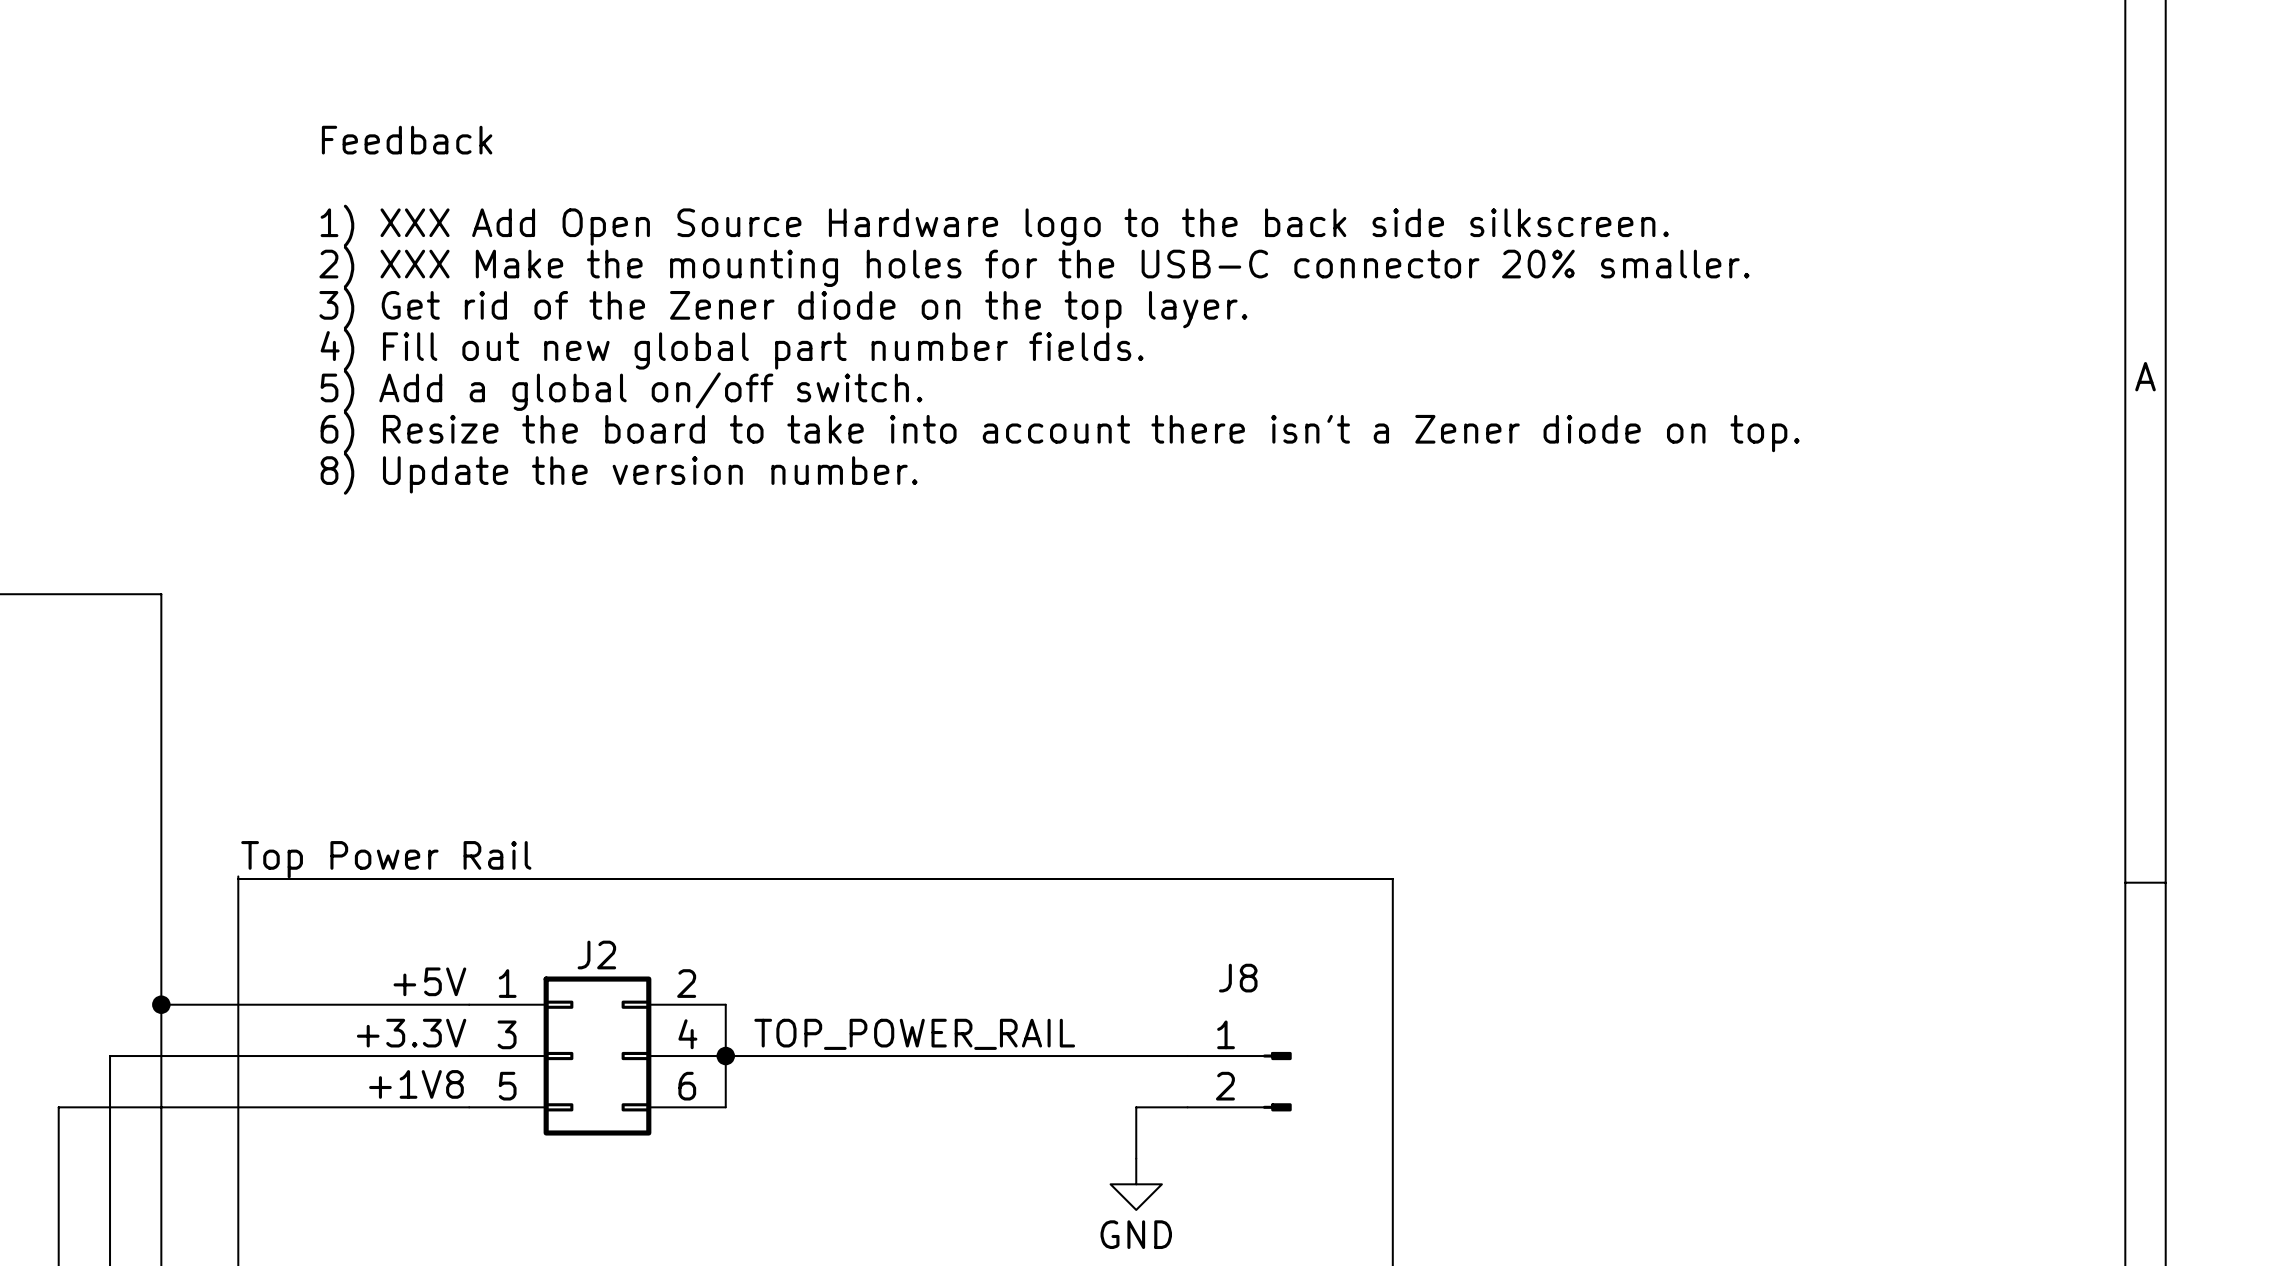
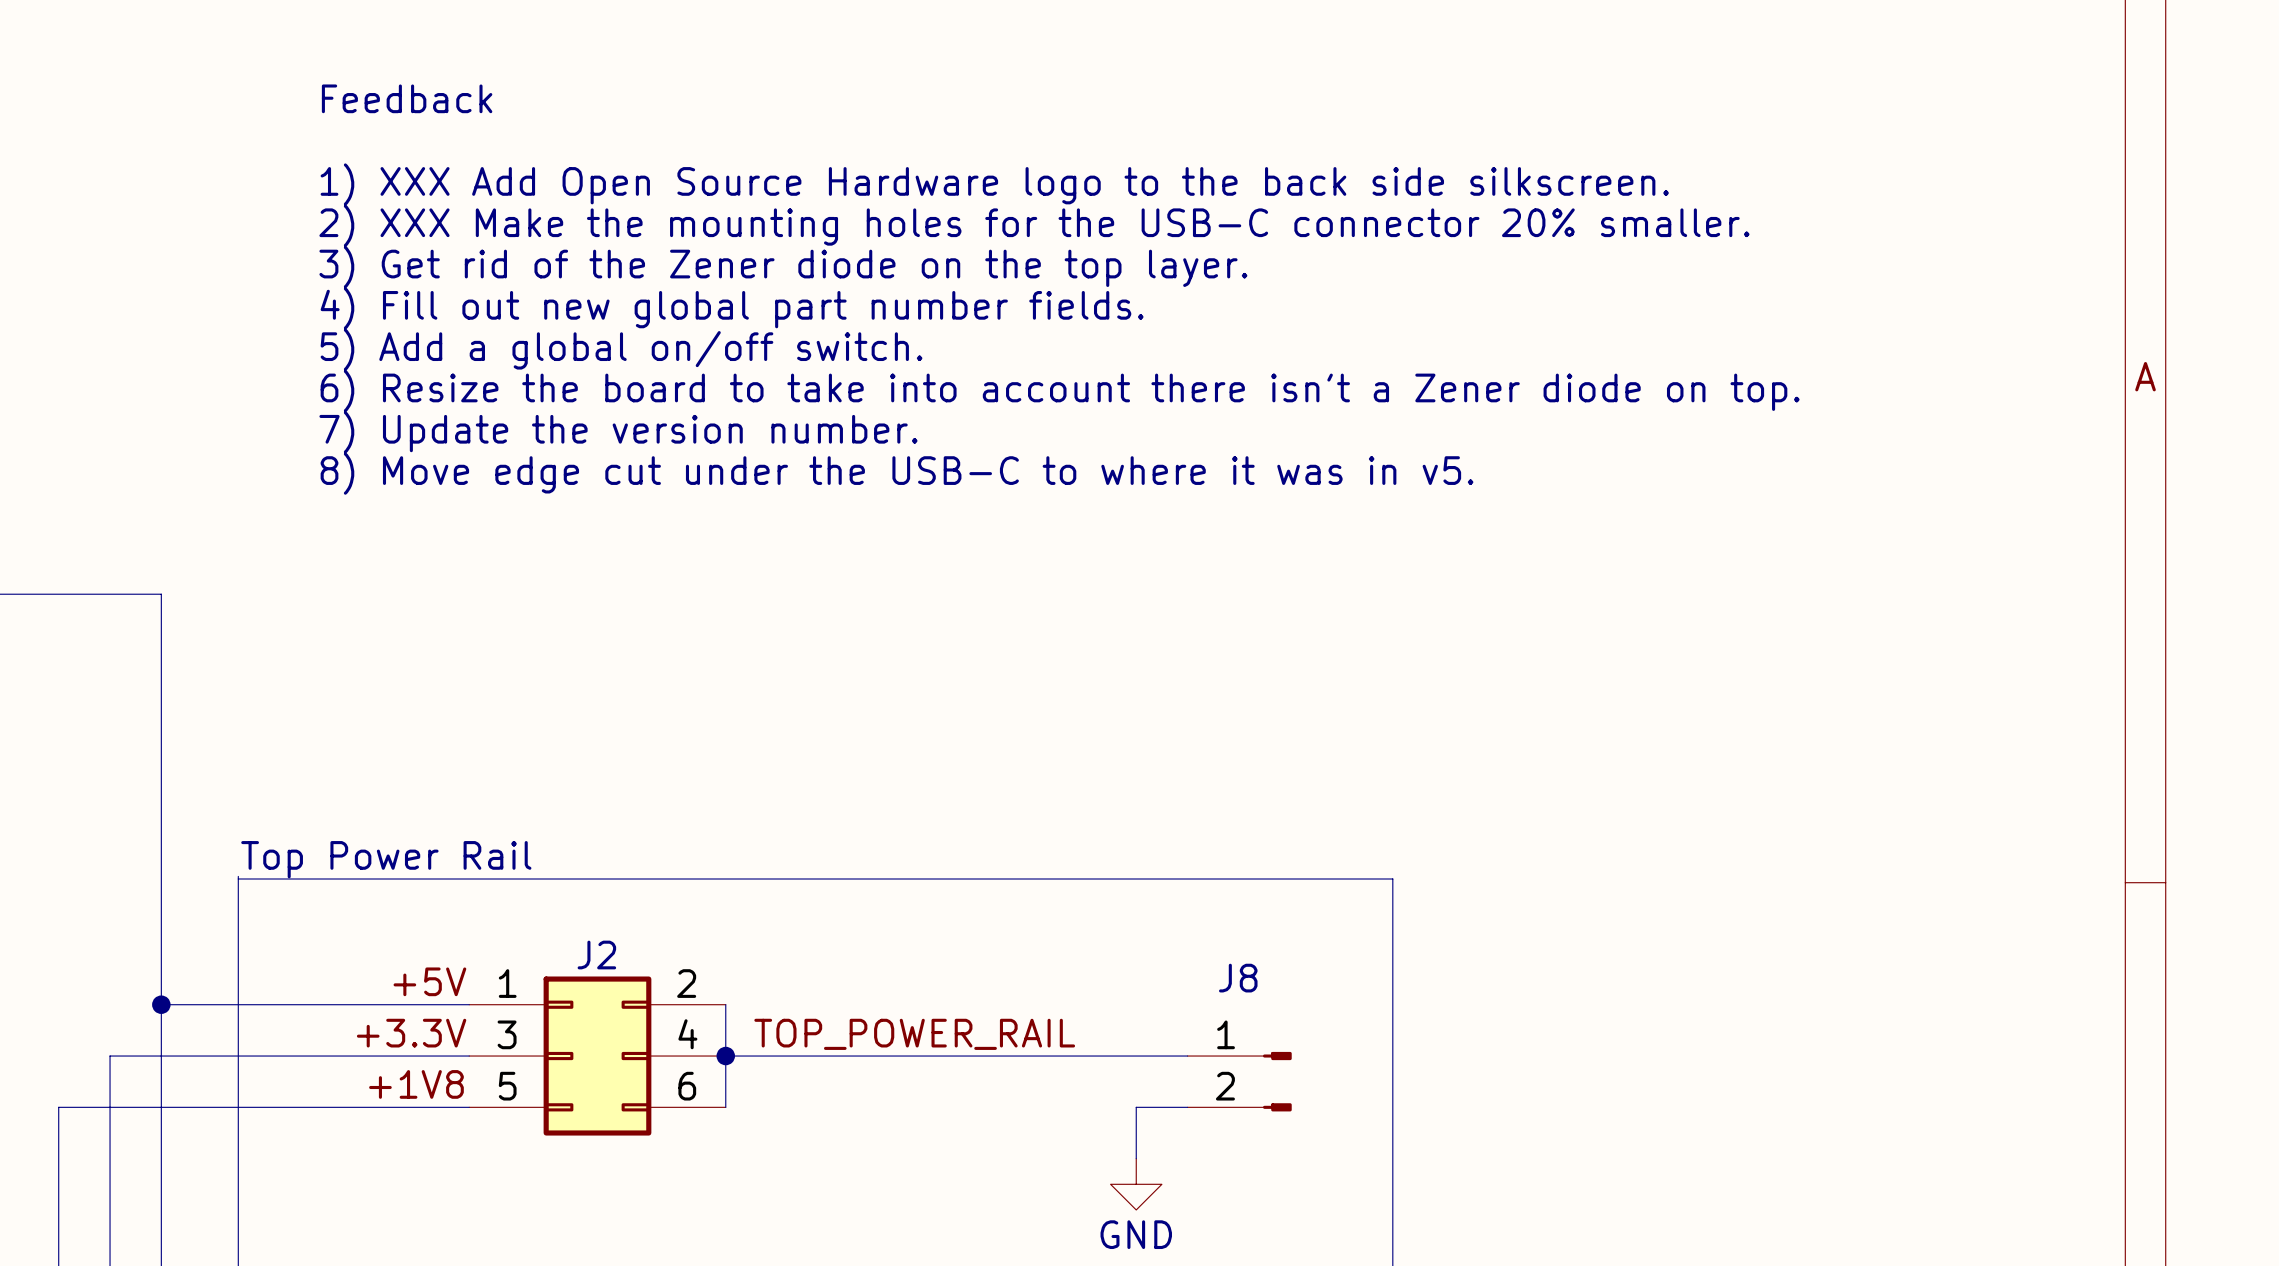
text position: Feedback (407, 140) -> Feedback (407, 98)
text: none -> 1) XXX Add Open Source Hardware logo to the back side silkscreen. (994, 184)
text: 1) XXX Add Open Source Hardware logo to the back side silkscreen. (994, 225) -> 2) XXX Make the mounting holes for the USB-C connector 20% smaller. (1034, 225)
text: 2) XXX Make the mounting holes for the USB-C connector 20% smaller. (1034, 267) -> 3) Get rid of the Zener diode on the top layer. (783, 267)
text: 3) Get rid of the Zener diode on the top layer. (783, 308) -> 4) Fill out new global part number fields. (732, 308)
text: 4) Fill out new global part number fields. (732, 349) -> 5) Add a global on/off switch. (621, 349)
text: 5) Add a global on/off switch. (621, 391) -> 6) Resize the board to take into account there isn't a Zener diode on top. (1060, 391)
text: 6) Resize the board to take into account there isn't a Zener diode on top. (1060, 432) -> 7) Update the version number. (618, 432)
text: 8) Update the version number. (619, 473) -> 8) Move edge cut under the USB-C to where it was in v5. (896, 473)

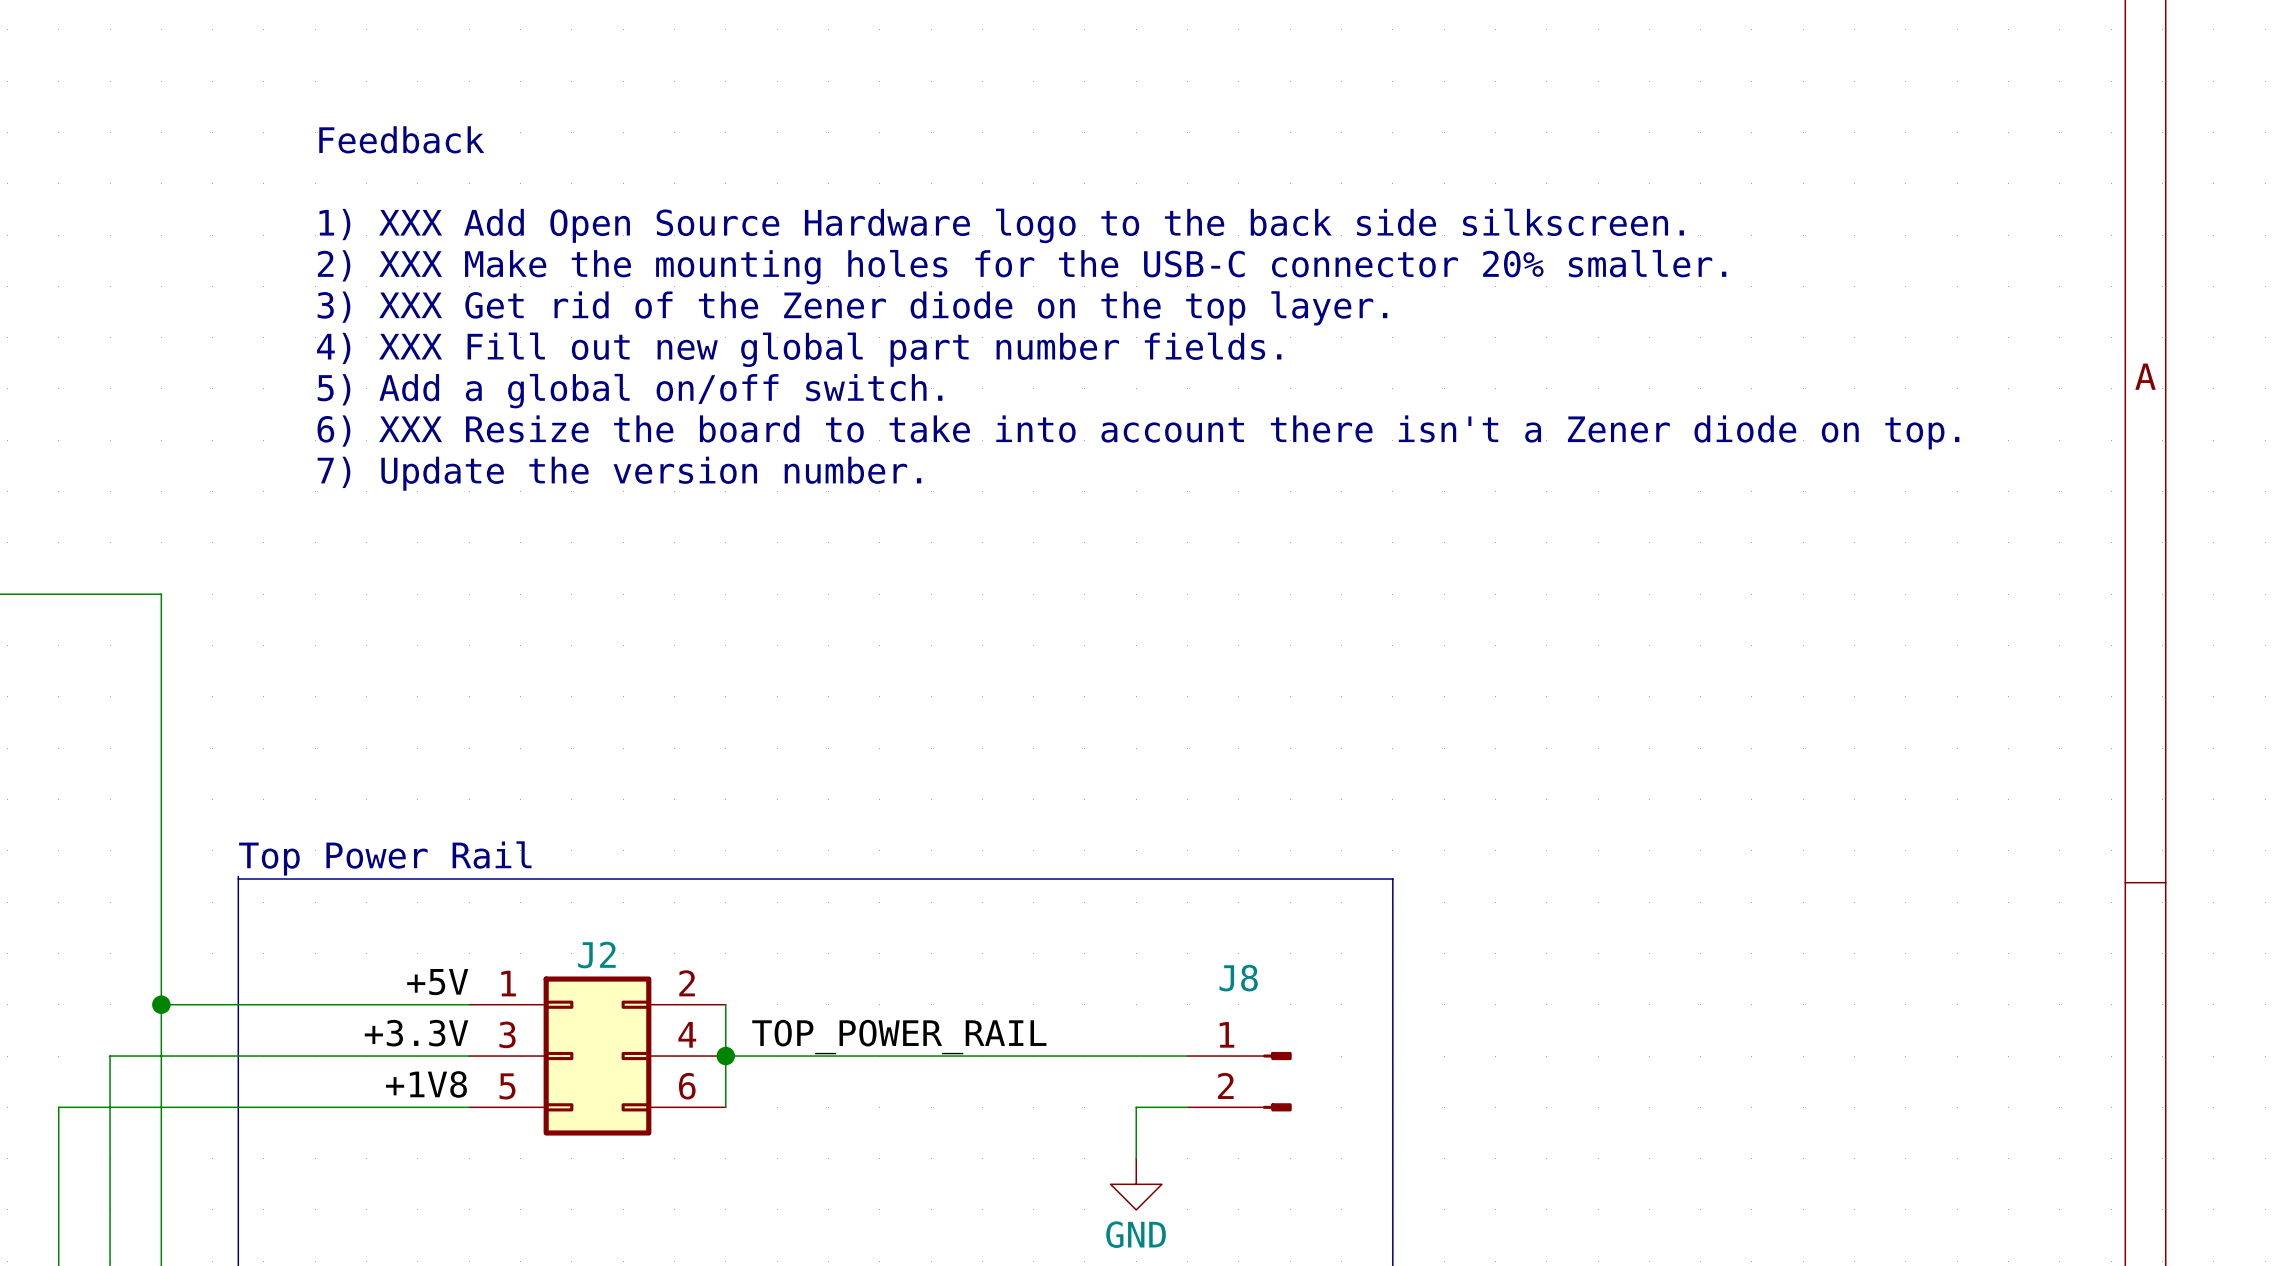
text position: Feedback (407, 98) -> Feedback (401, 139)
text: 1) XXX Add Open Source Hardware logo to the back side silkscreen. (994, 184) -> none
text: 2) XXX Make the mounting holes for the USB-C connector 20% smaller. (1034, 225) -> 1) XXX Add Open Source Hardware logo to the back side silkscreen. (1001, 225)
text: 3) Get rid of the Zener diode on the top layer. (783, 267) -> 2) XXX Make the mounting holes for the USB-C connector 20% smaller. (1022, 267)
text: 4) Fill out new global part number fields. (732, 308) -> 3) XXX Get rid of the Zener diode on the top layer. (852, 308)
text: 5) Add a global on/off switch. (621, 349) -> 4) XXX Fill out new global part number fields. (799, 349)
text: 6) Resize the board to take into account there isn't a Zener diode on top. (1060, 391) -> 5) Add a global on/off switch. (630, 391)
text: 7) Update the version number. (618, 432) -> 6) XXX Resize the board to take into account there isn't a Zener diode on top. (1138, 432)
text: 8) Move edge cut under the USB-C to where it was in v5. (896, 473) -> 7) Update the version number. (619, 473)

